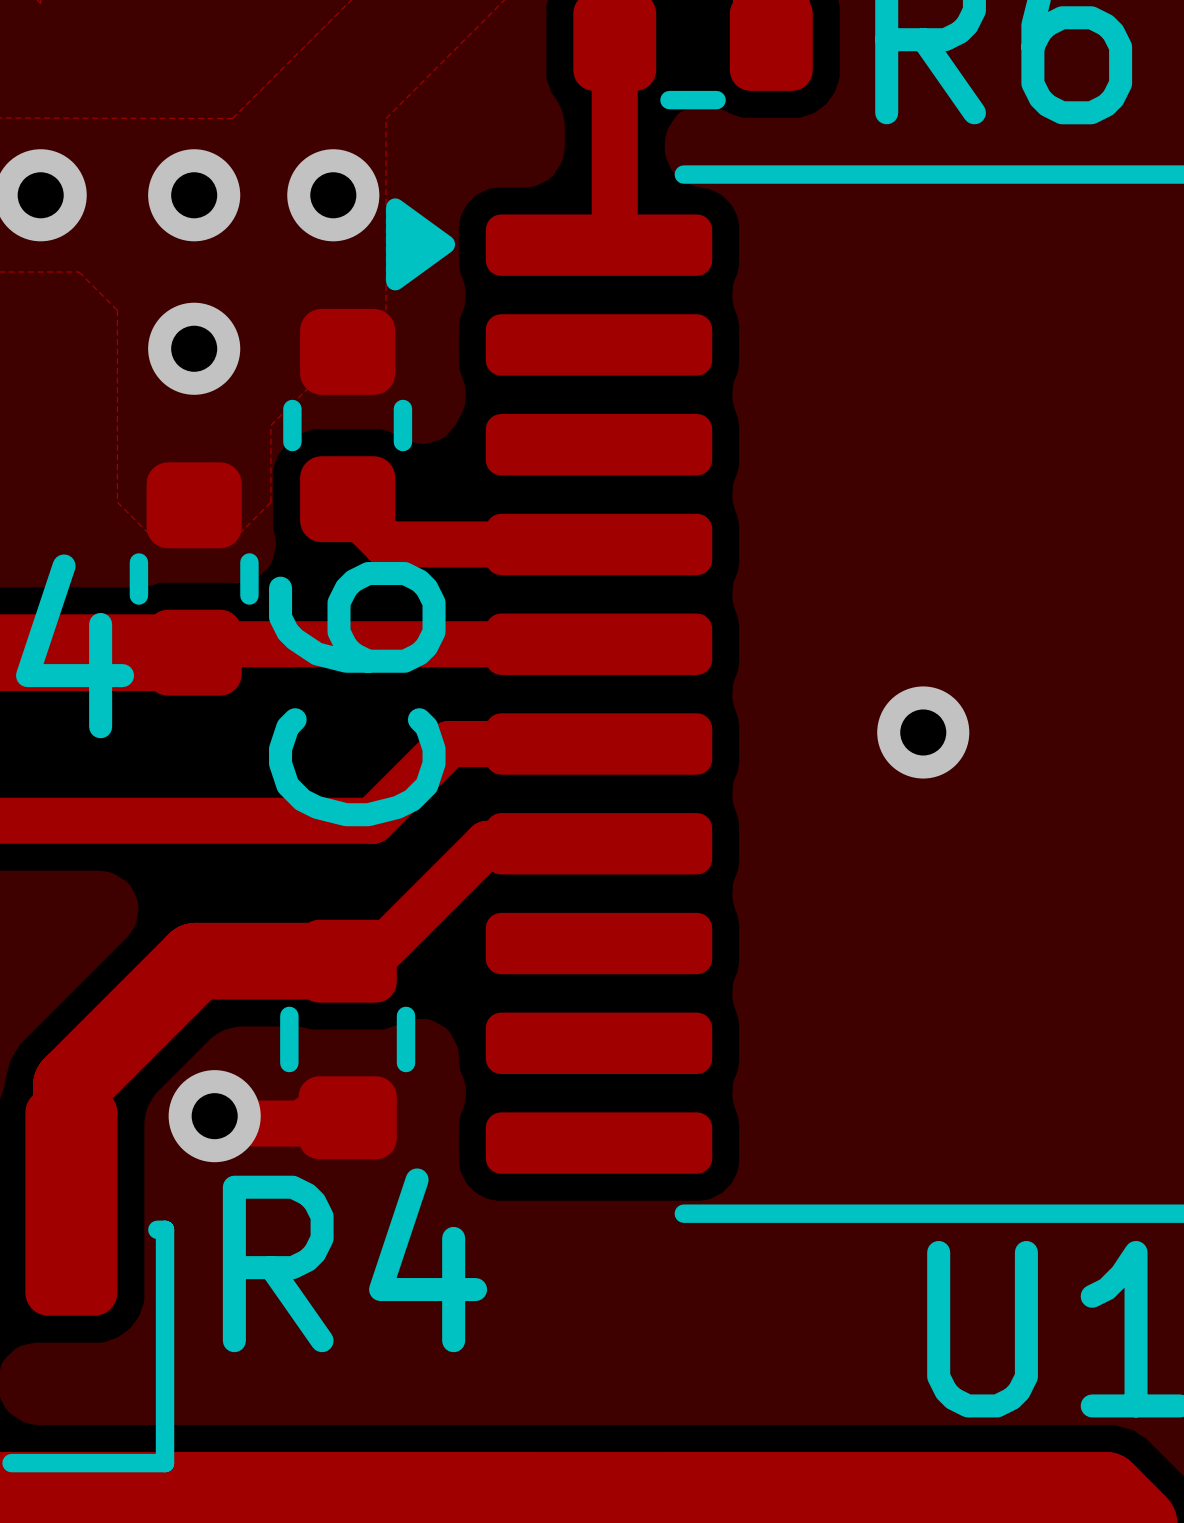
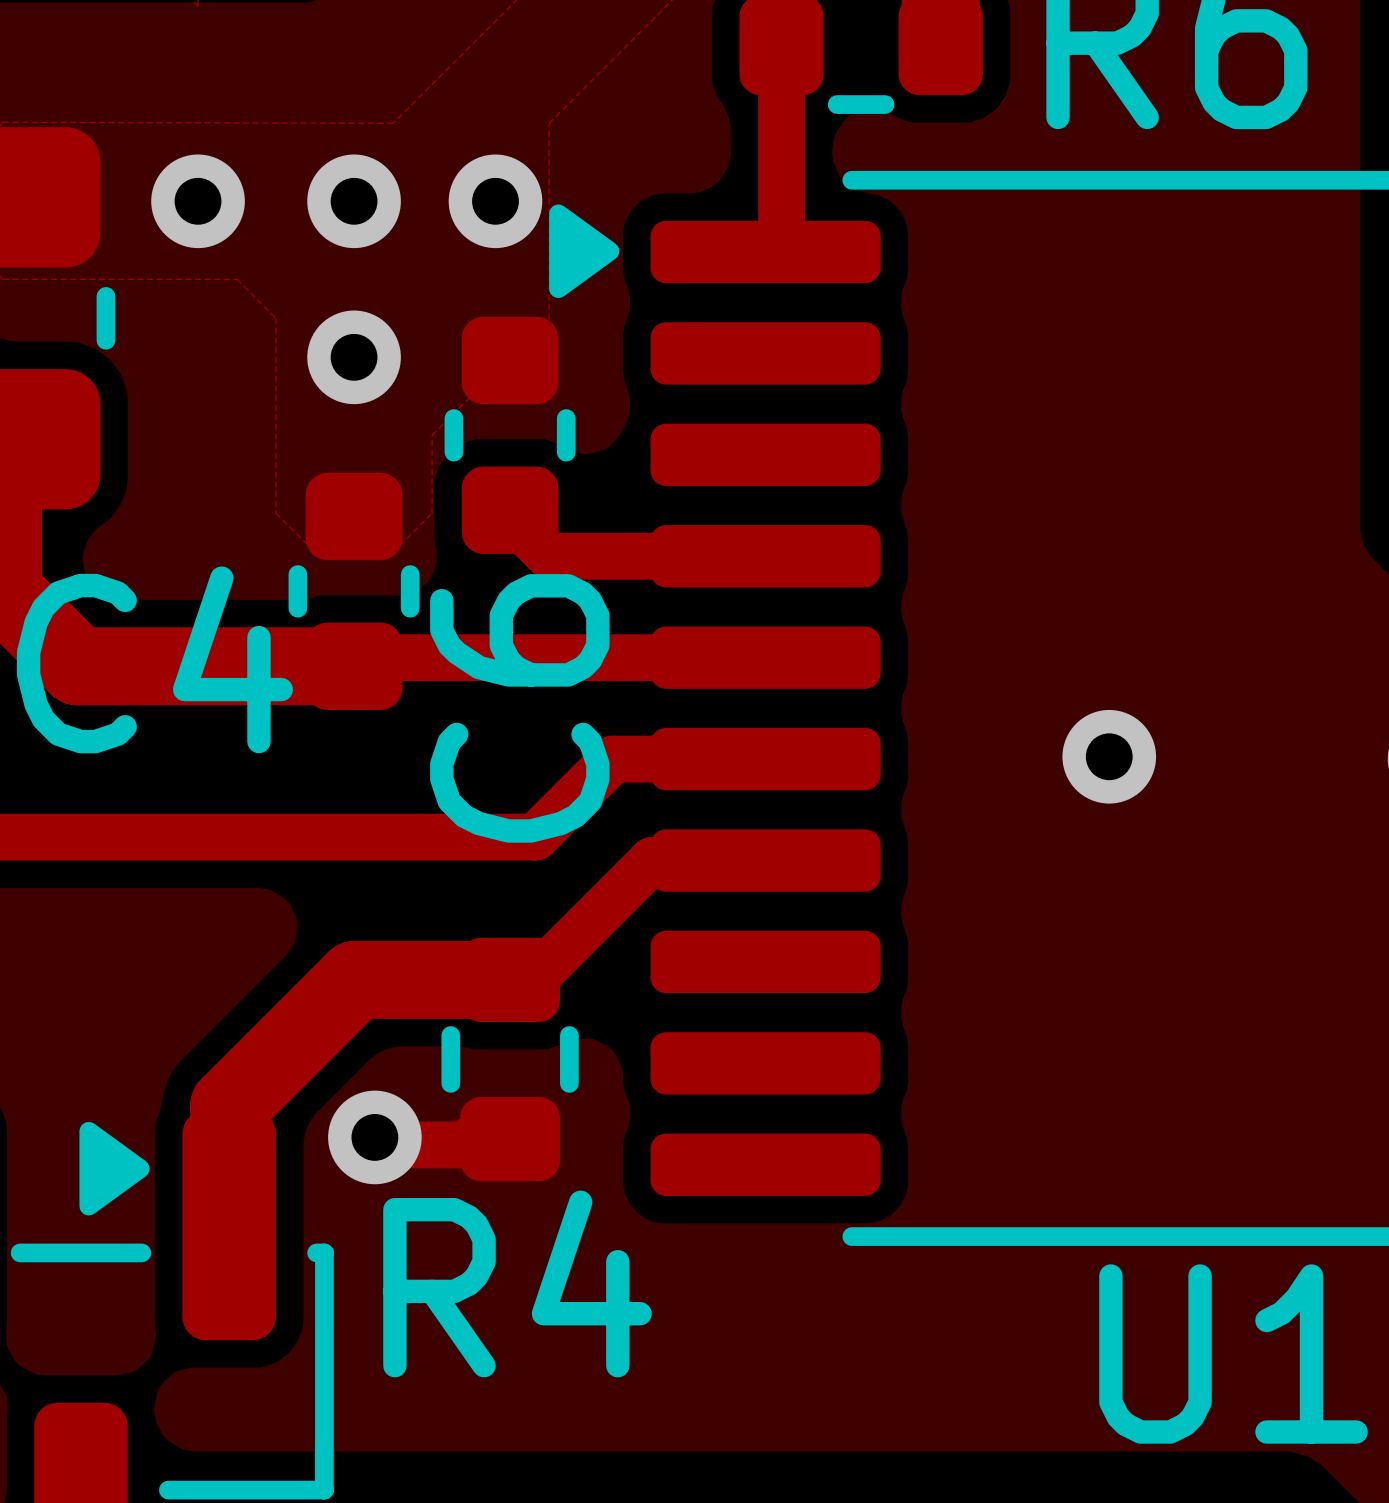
via position: (923, 732) -> (1109, 756)

